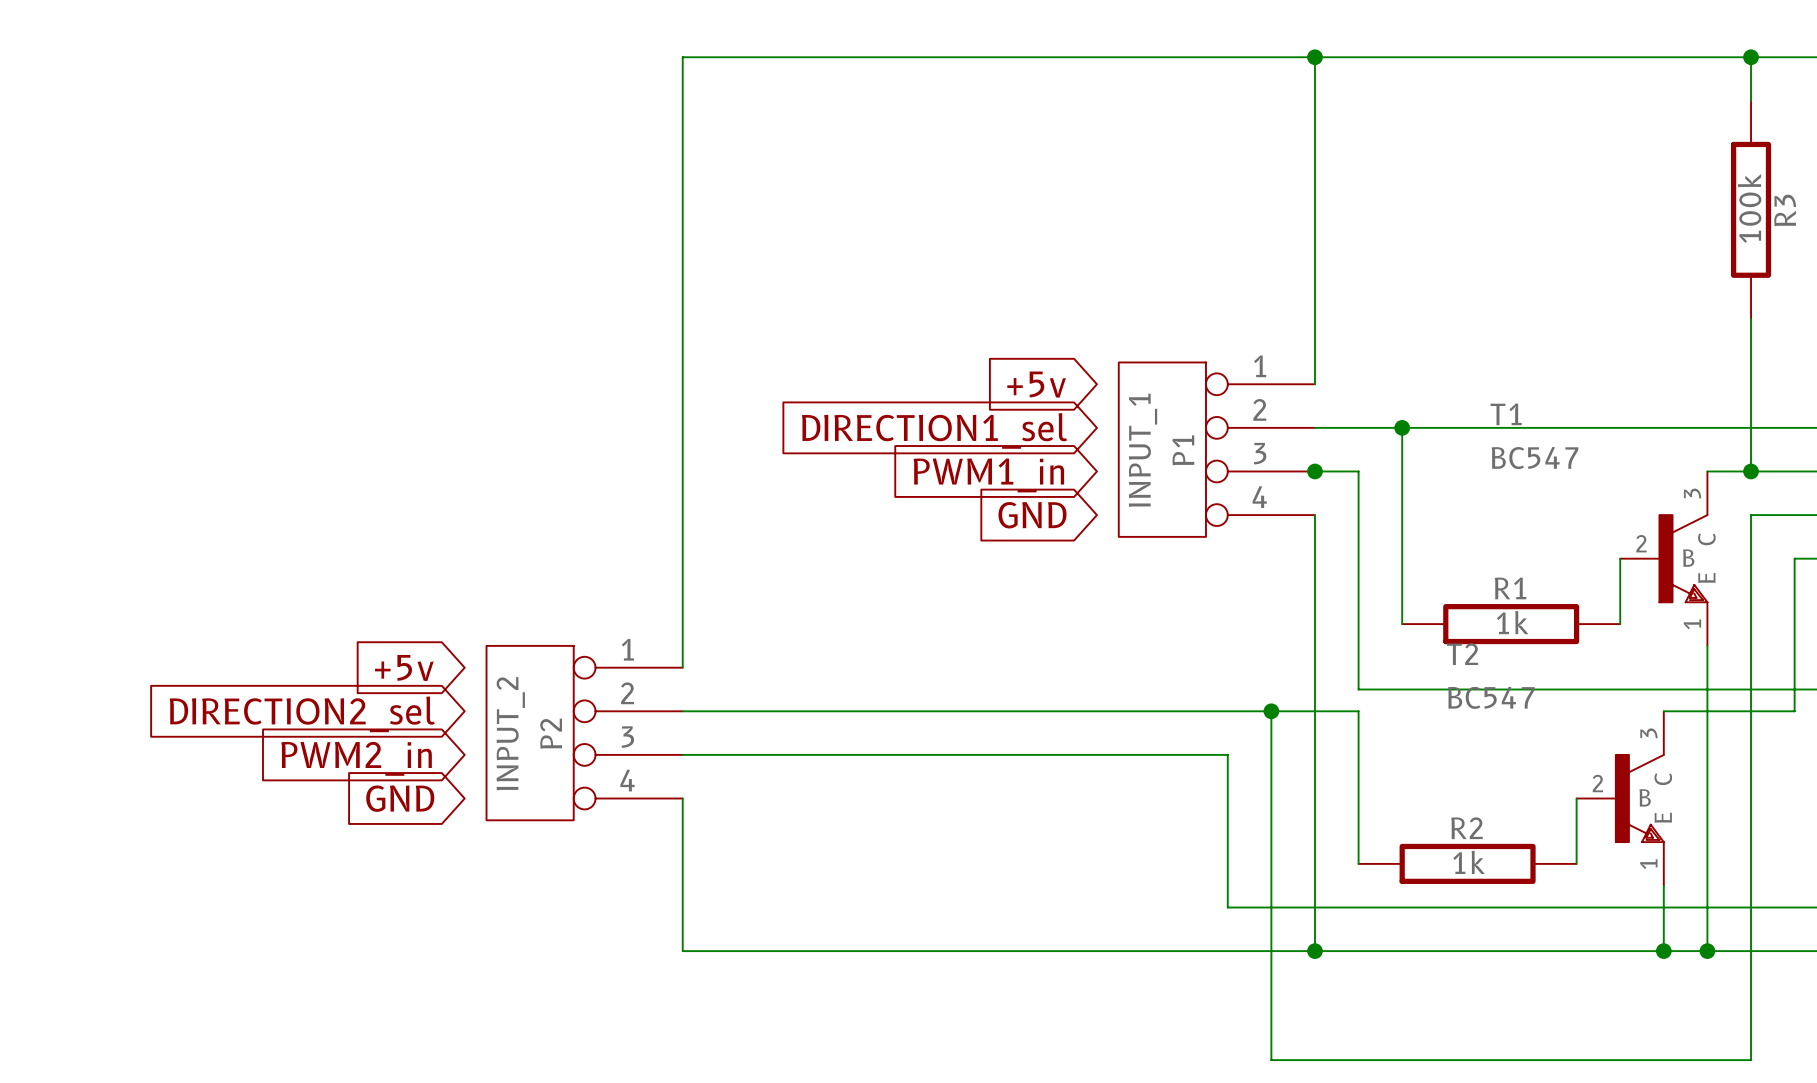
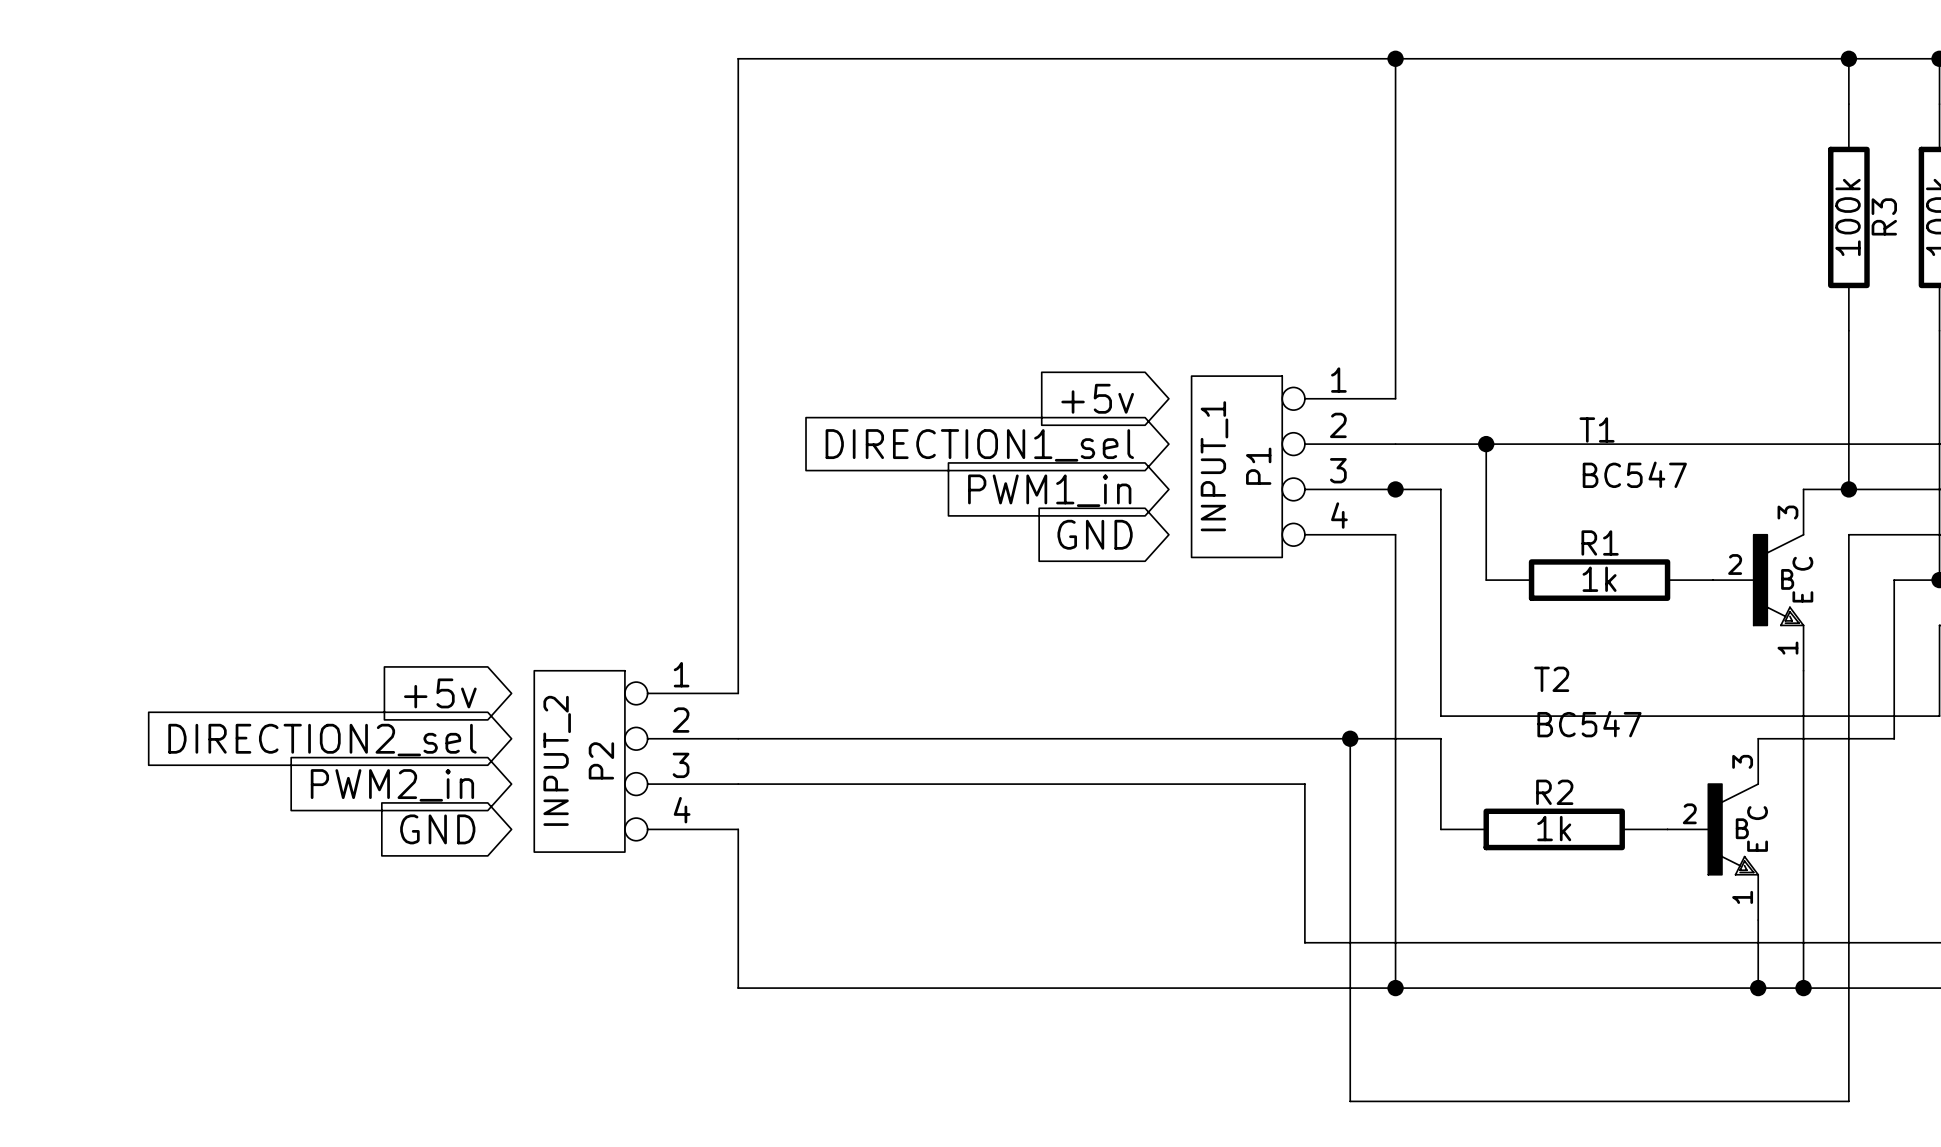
wire: (1402, 558) (1402, 624) -> none
wire: (1620, 558) (1620, 624) -> none
R1 position: (1511, 624) -> (1599, 580)
wire: (1358, 798) (1358, 863) -> none
wire: (1576, 798) (1576, 863) -> none
R2 position: (1467, 863) -> (1554, 829)

